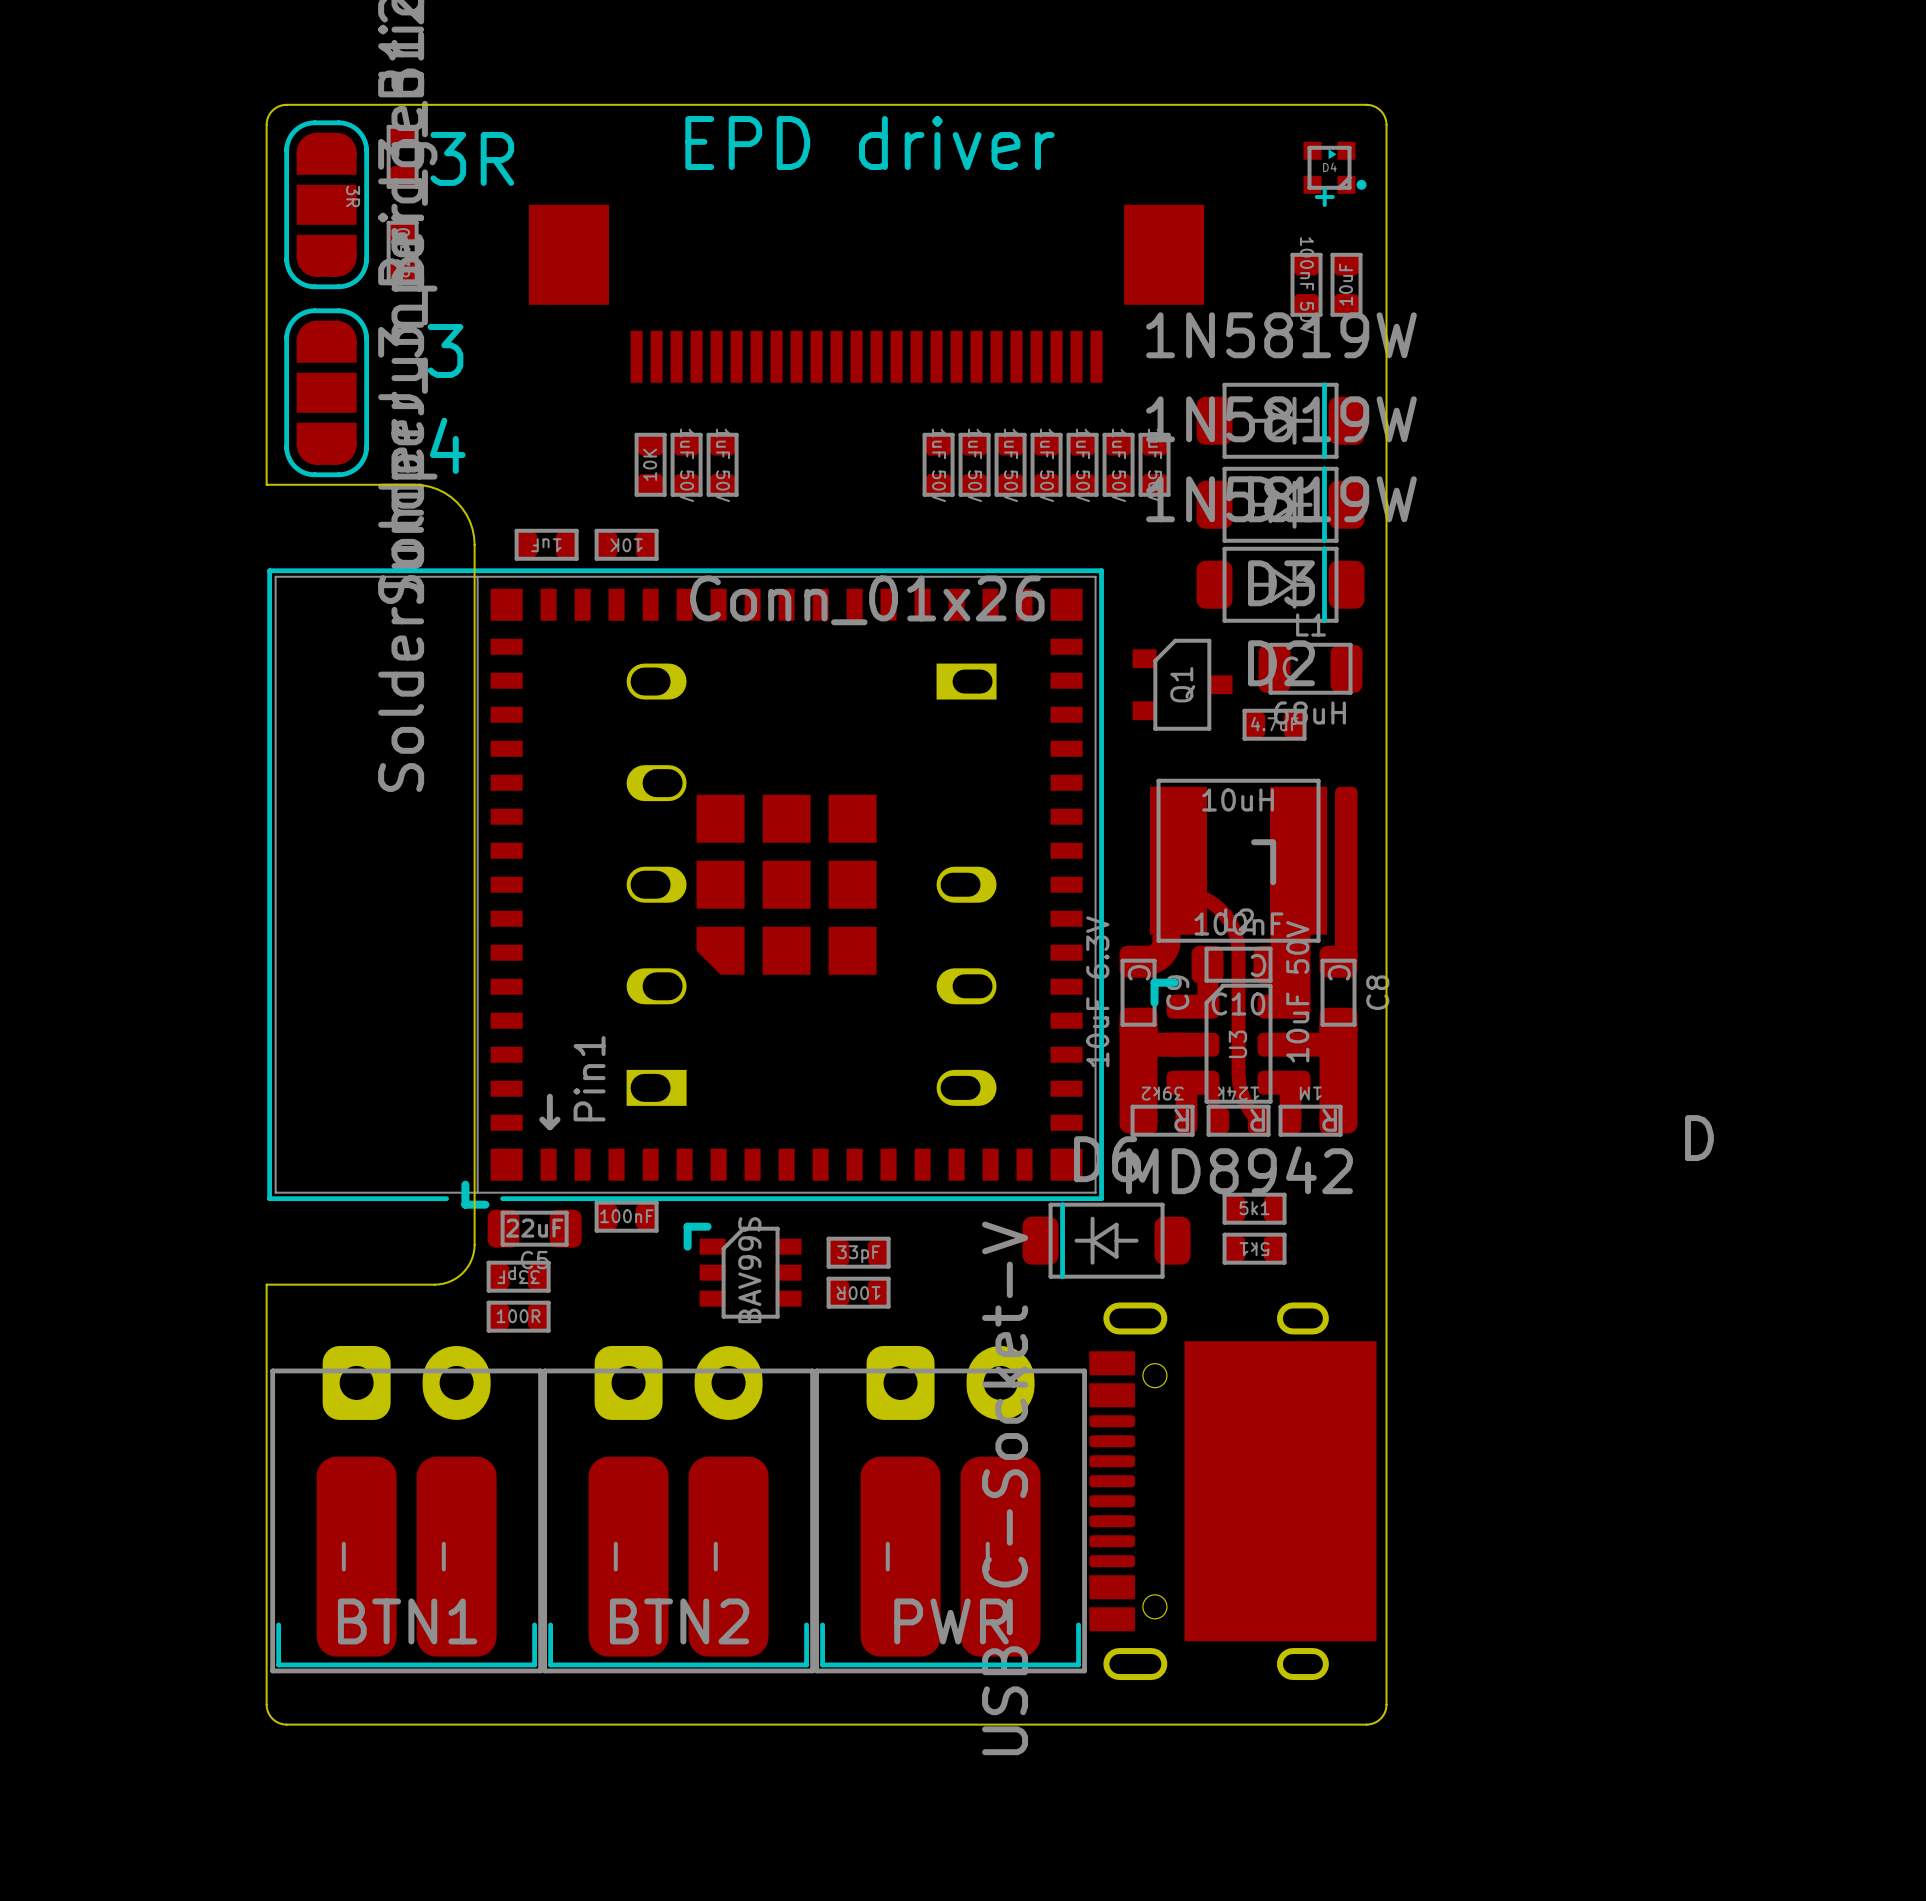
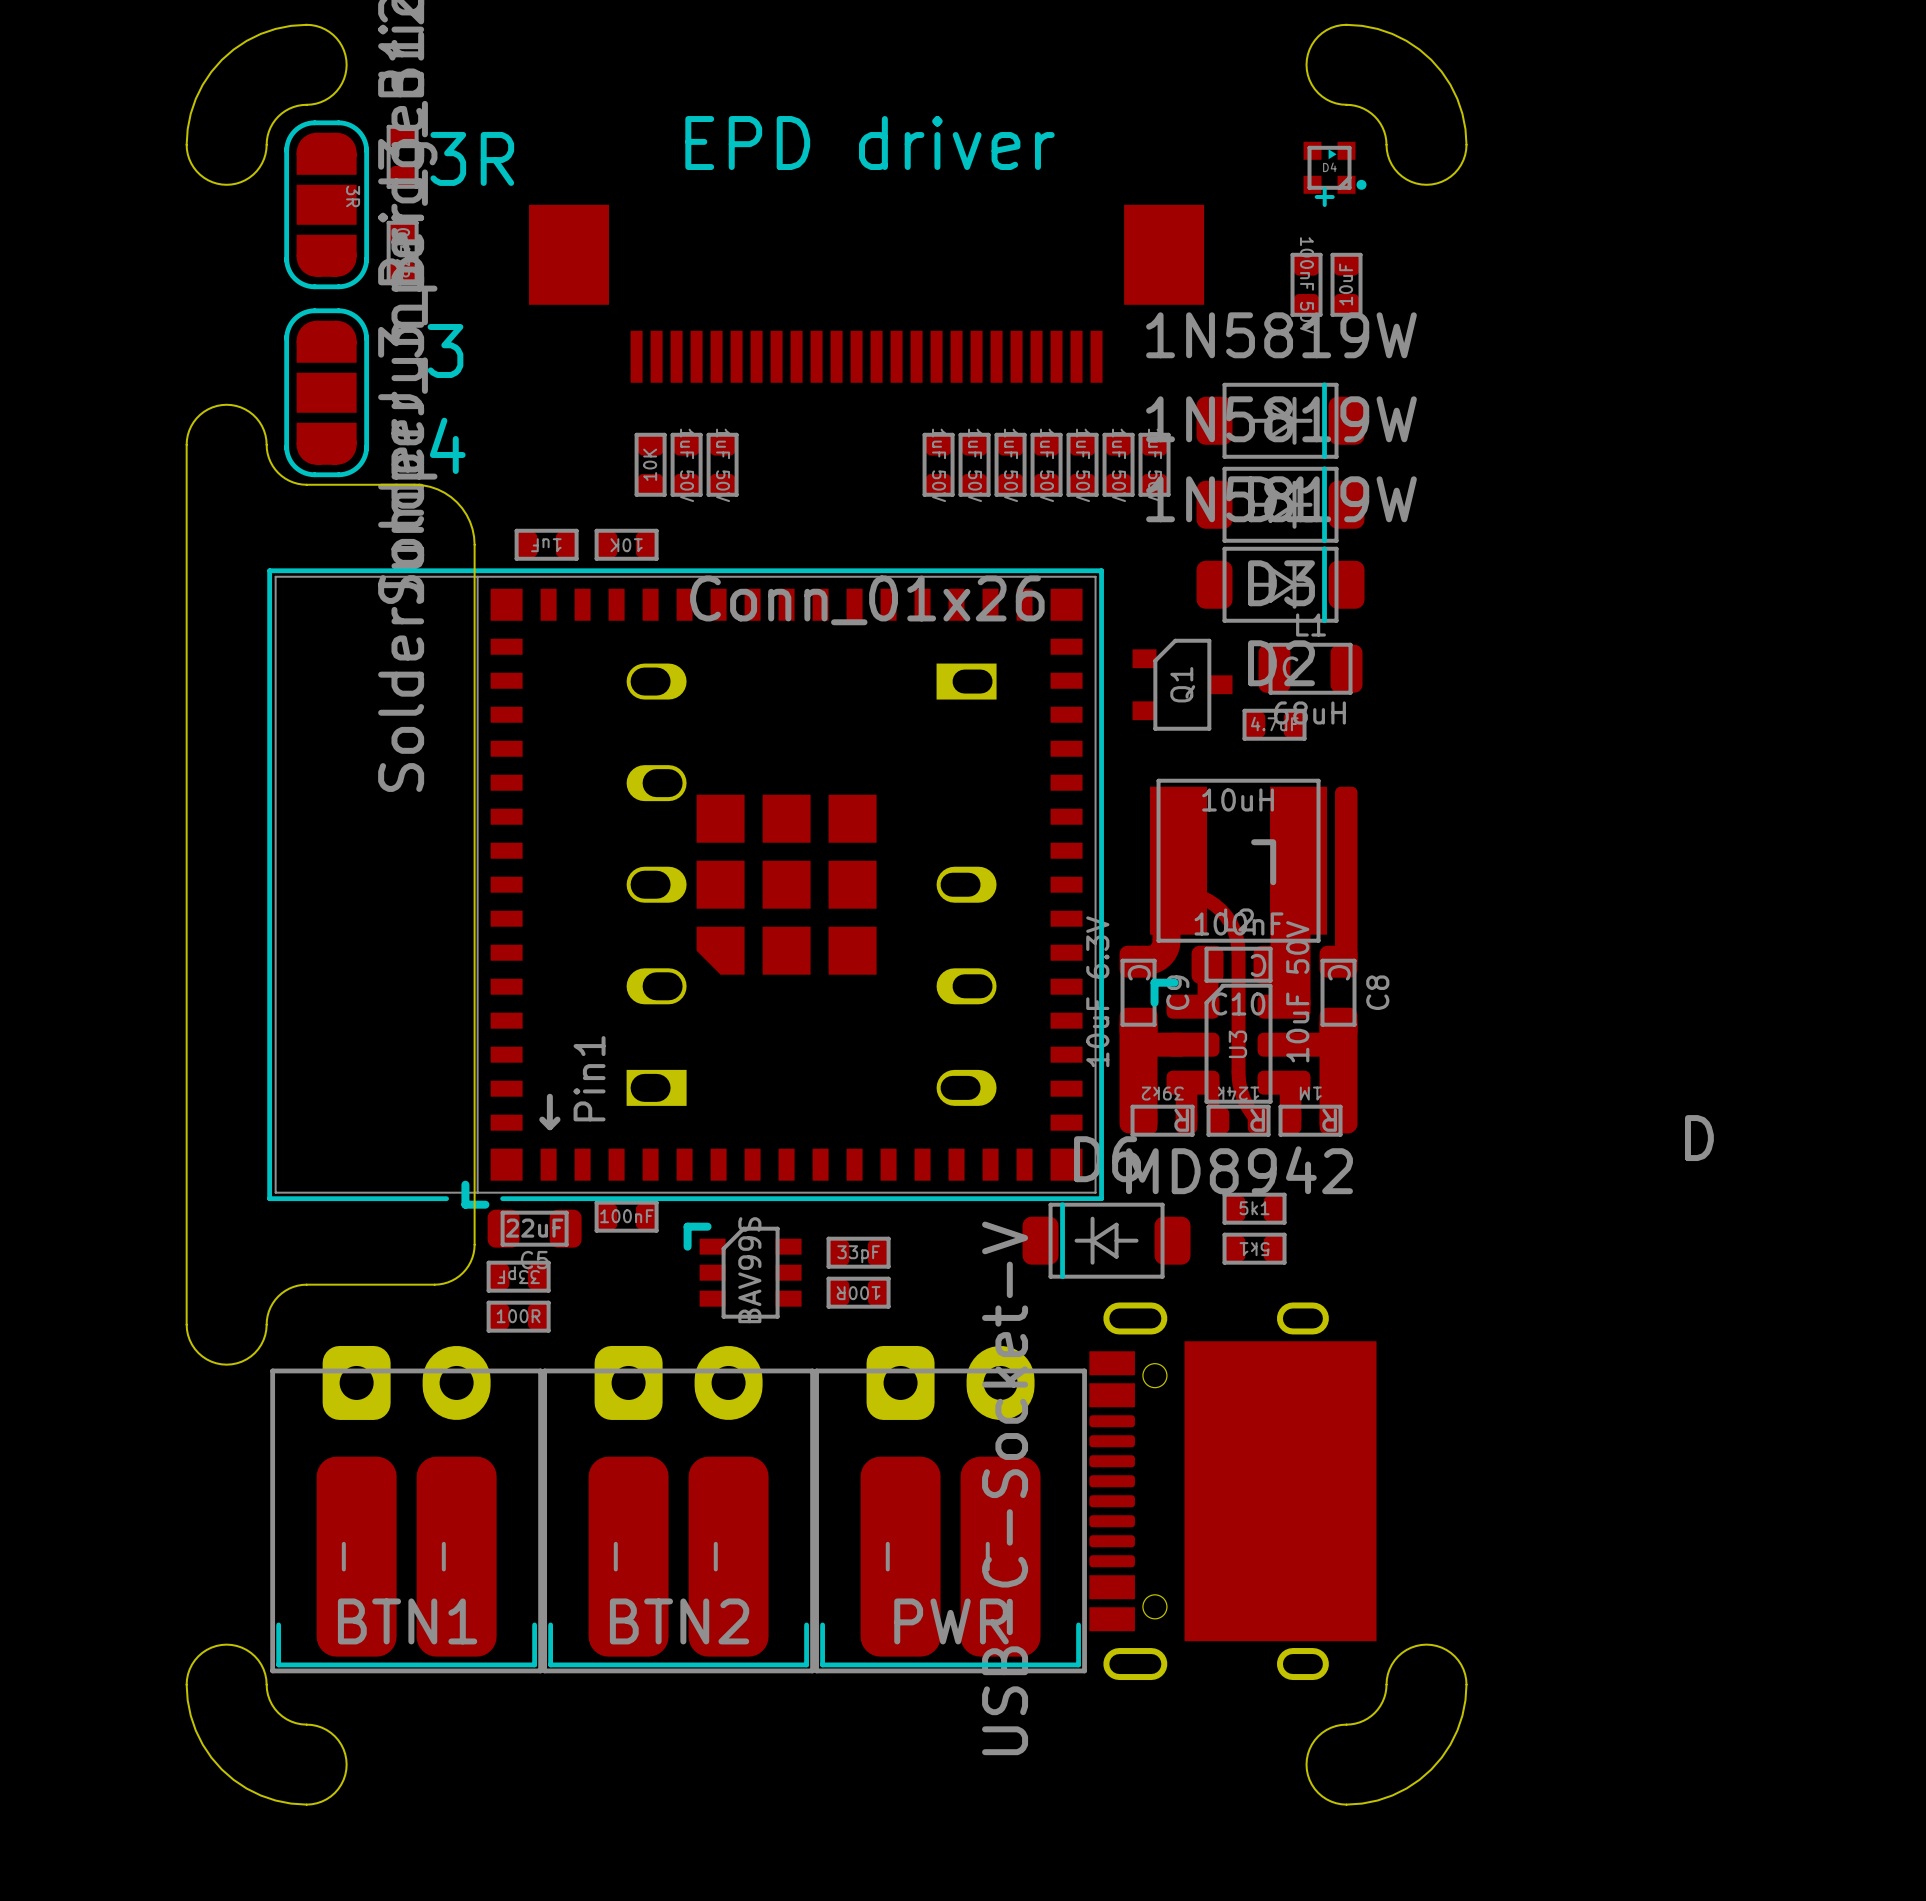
board edge: none -> (306, 24) (320, 27) (329, 31) (342, 46) (346, 64) (344, 79) (339, 87) (325, 100) (293, 107) (278, 116) (268, 131) (262, 163) (249, 177) (236, 183) (226, 184) (217, 183) (203, 177) (196, 171) (189, 158) (186, 144) (187, 129) (195, 98) (211, 71) (233, 49) (260, 33) (290, 25) (306, 24)
board edge: none -> (1346, 24) (1377, 28) (1406, 40) (1431, 59) (1450, 84) (1462, 113) (1466, 144) (1461, 164) (1446, 179) (1426, 184) (1411, 181) (1402, 176) (1389, 160) (1384, 131) (1374, 116) (1359, 107) (1336, 103) (1326, 99) (1311, 84) (1306, 64) (1311, 44) (1326, 30) (1346, 24)
board edge: (306, 484) (266, 484) (266, 124) (269, 114) (278, 106) (286, 104) (1366, 104) (1374, 106) (1380, 110) (1384, 117) (1386, 124) (1386, 1704) (1384, 1712) (1378, 1720) (1366, 1724) (286, 1724) (278, 1723) (269, 1714) (266, 1704) (266, 1284) (306, 1284) -> (306, 484) (289, 480) (275, 469) (268, 457) (262, 426) (253, 414) (245, 409) (226, 404) (212, 407) (200, 414) (191, 426) (186, 444) (186, 1324) (192, 1344) (202, 1356) (216, 1363) (231, 1364) (246, 1359) (258, 1349) (263, 1339) (268, 1311) (275, 1299) (289, 1288) (306, 1284)
board edge: none -> (186, 1684) (192, 1664) (206, 1649) (226, 1644) (246, 1649) (261, 1664) (265, 1674) (269, 1699) (278, 1712) (296, 1723) (321, 1727) (338, 1740) (343, 1749) (346, 1764) (341, 1784) (326, 1799) (306, 1804) (275, 1800) (246, 1788) (221, 1769) (202, 1744) (190, 1715) (186, 1684)
board edge: none -> (1386, 1684) (1389, 1669) (1394, 1660) (1411, 1647) (1426, 1644) (1436, 1645) (1454, 1656) (1463, 1669) (1466, 1684) (1462, 1715) (1450, 1744) (1441, 1757) (1419, 1779) (1392, 1795) (1377, 1800) (1346, 1804) (1326, 1799) (1314, 1788) (1307, 1774) (1306, 1759) (1311, 1744) (1318, 1736) (1331, 1727) (1359, 1722) (1371, 1715) (1382, 1701) (1386, 1684)

